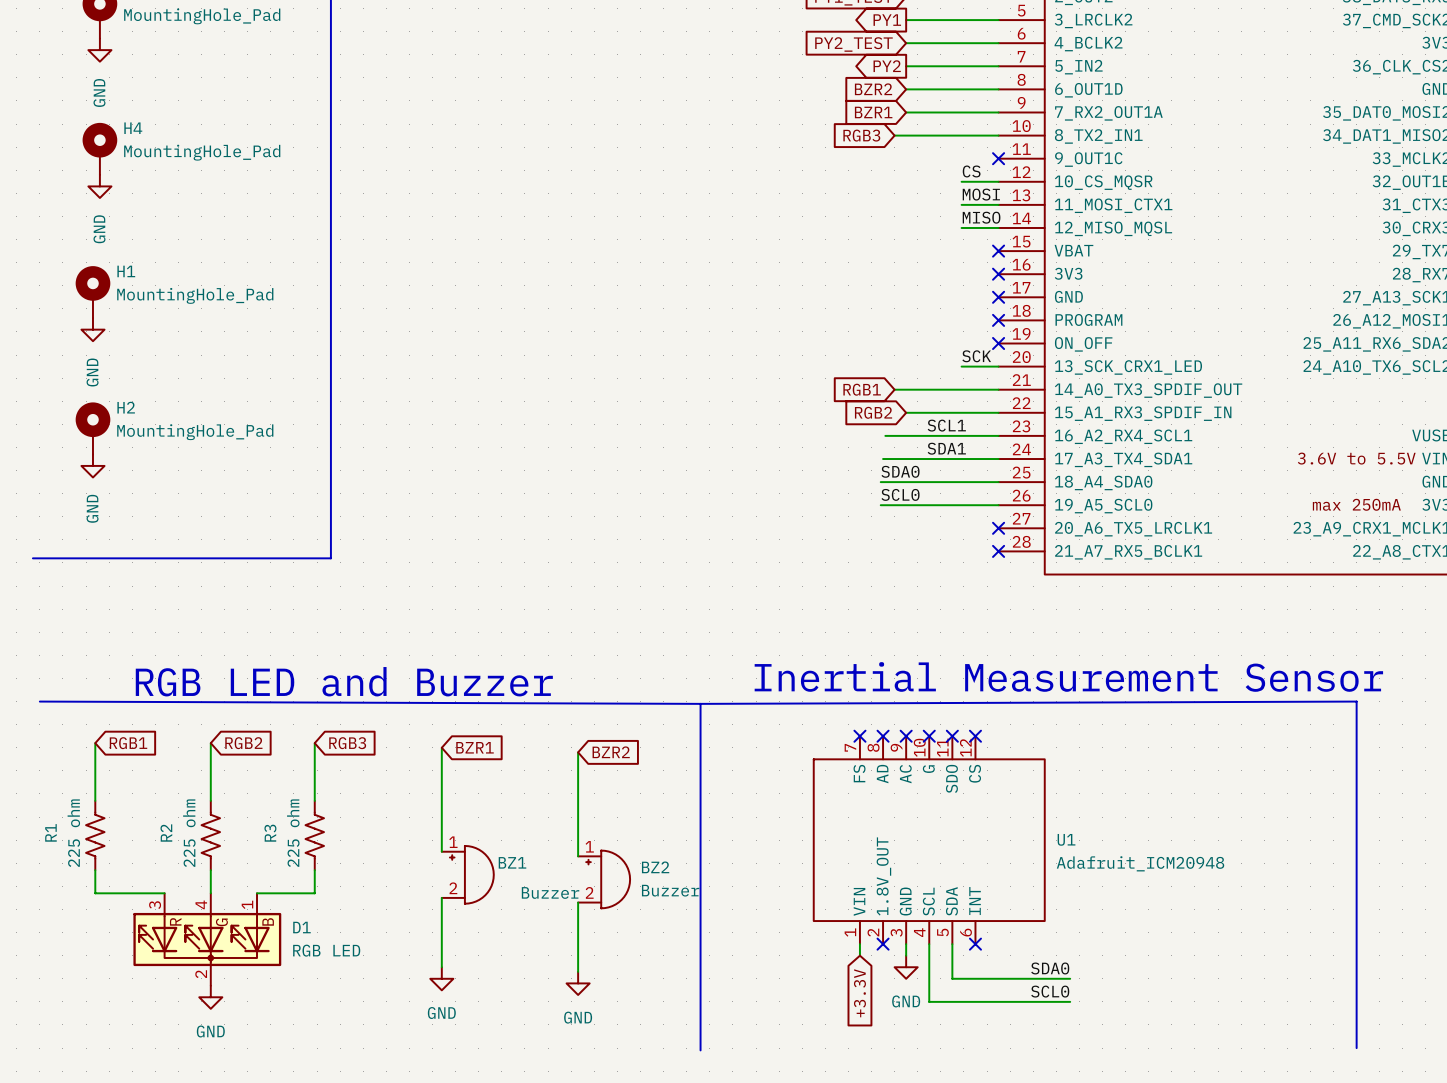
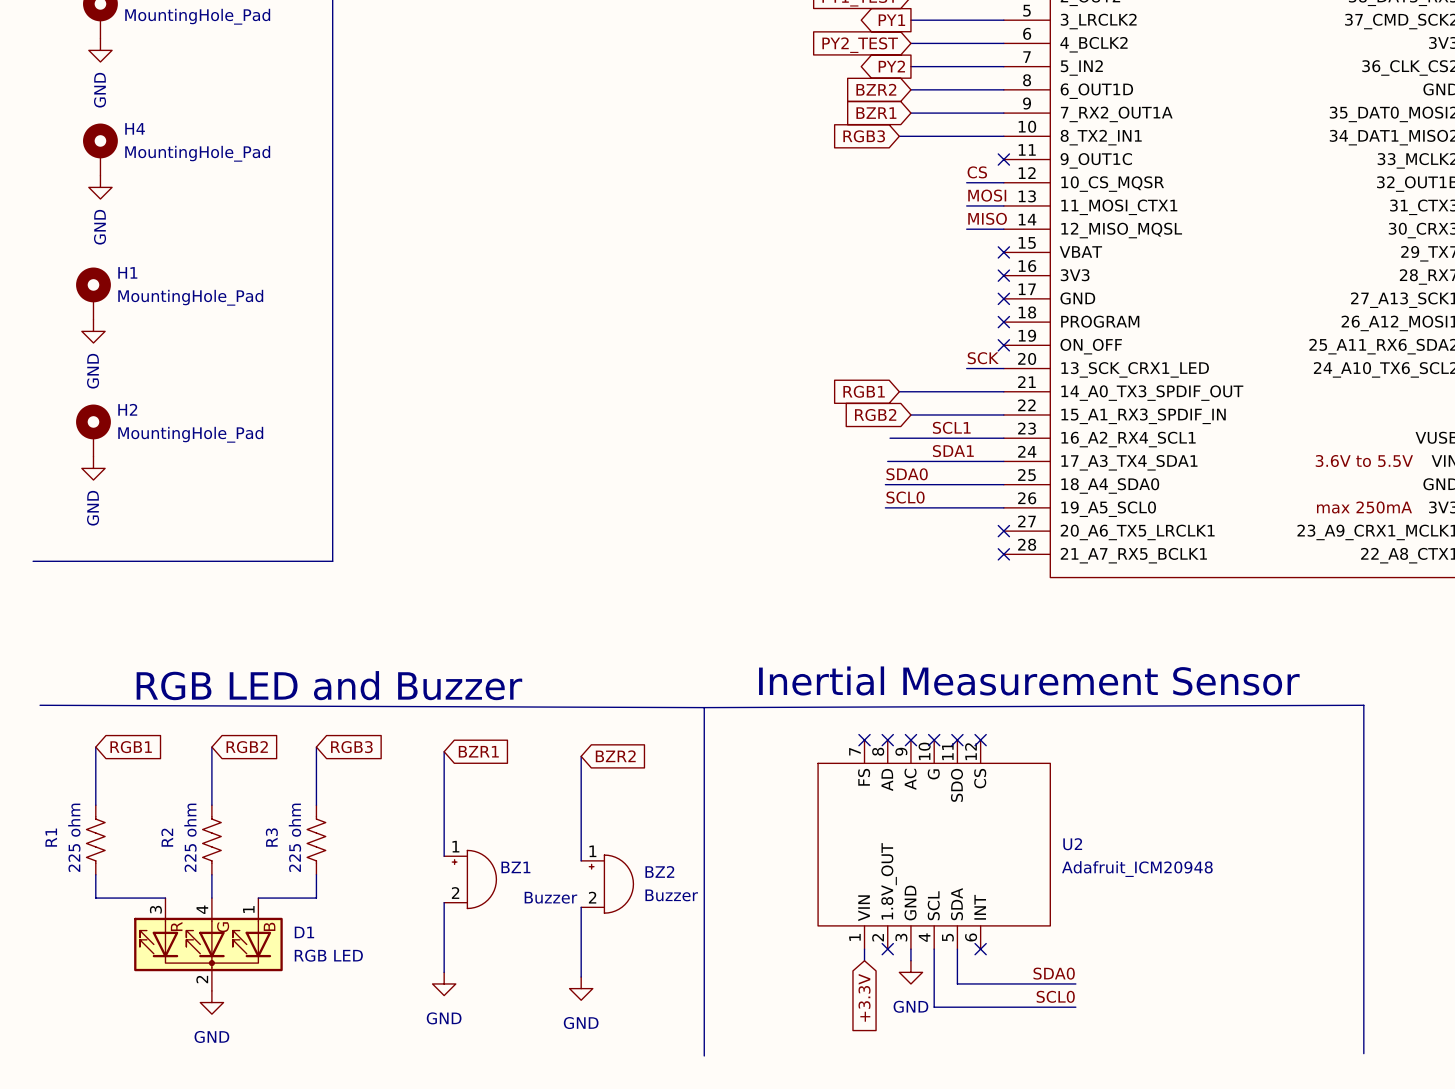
U1 name: U1 (1066, 839) -> U2 (1072, 844)

